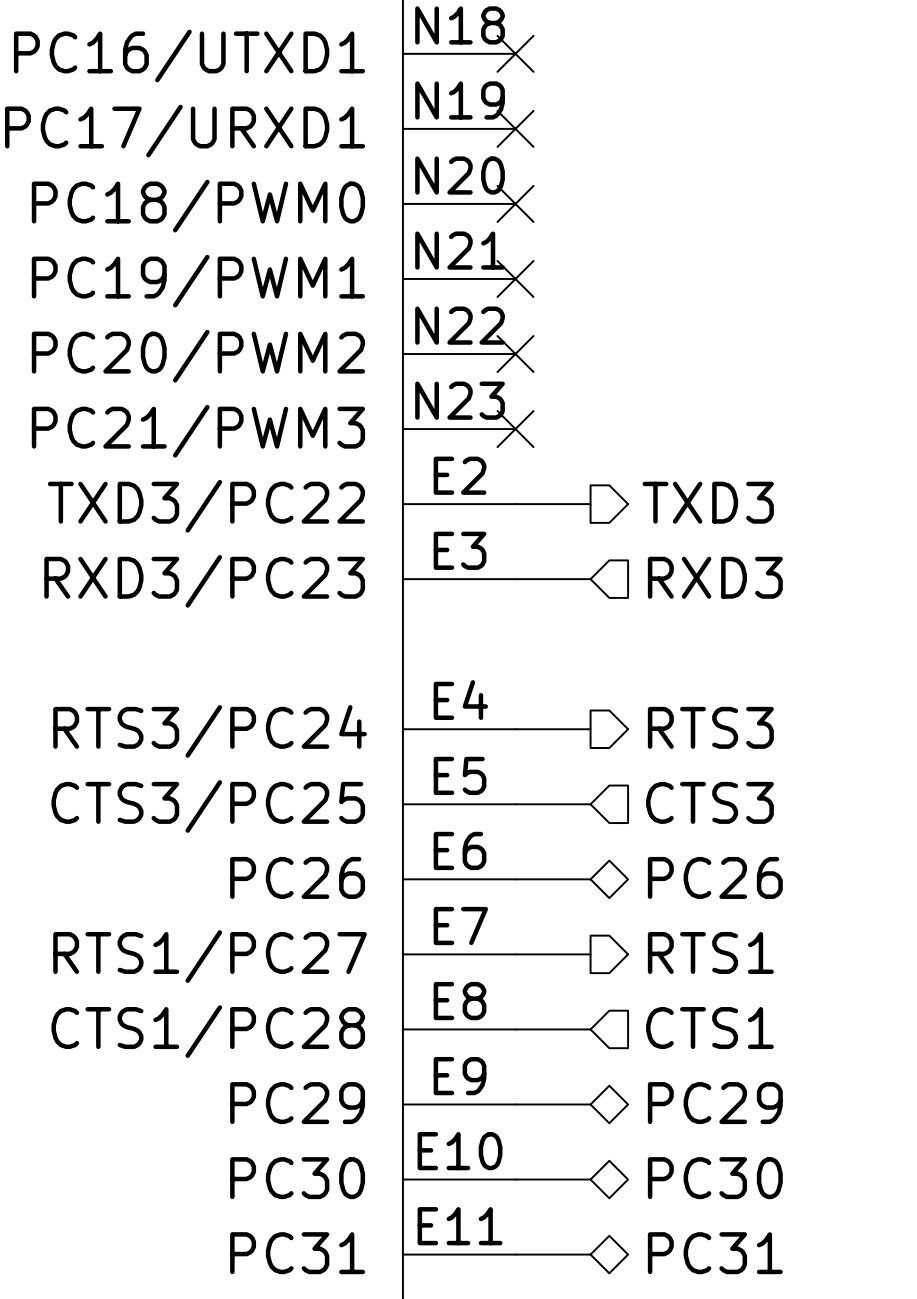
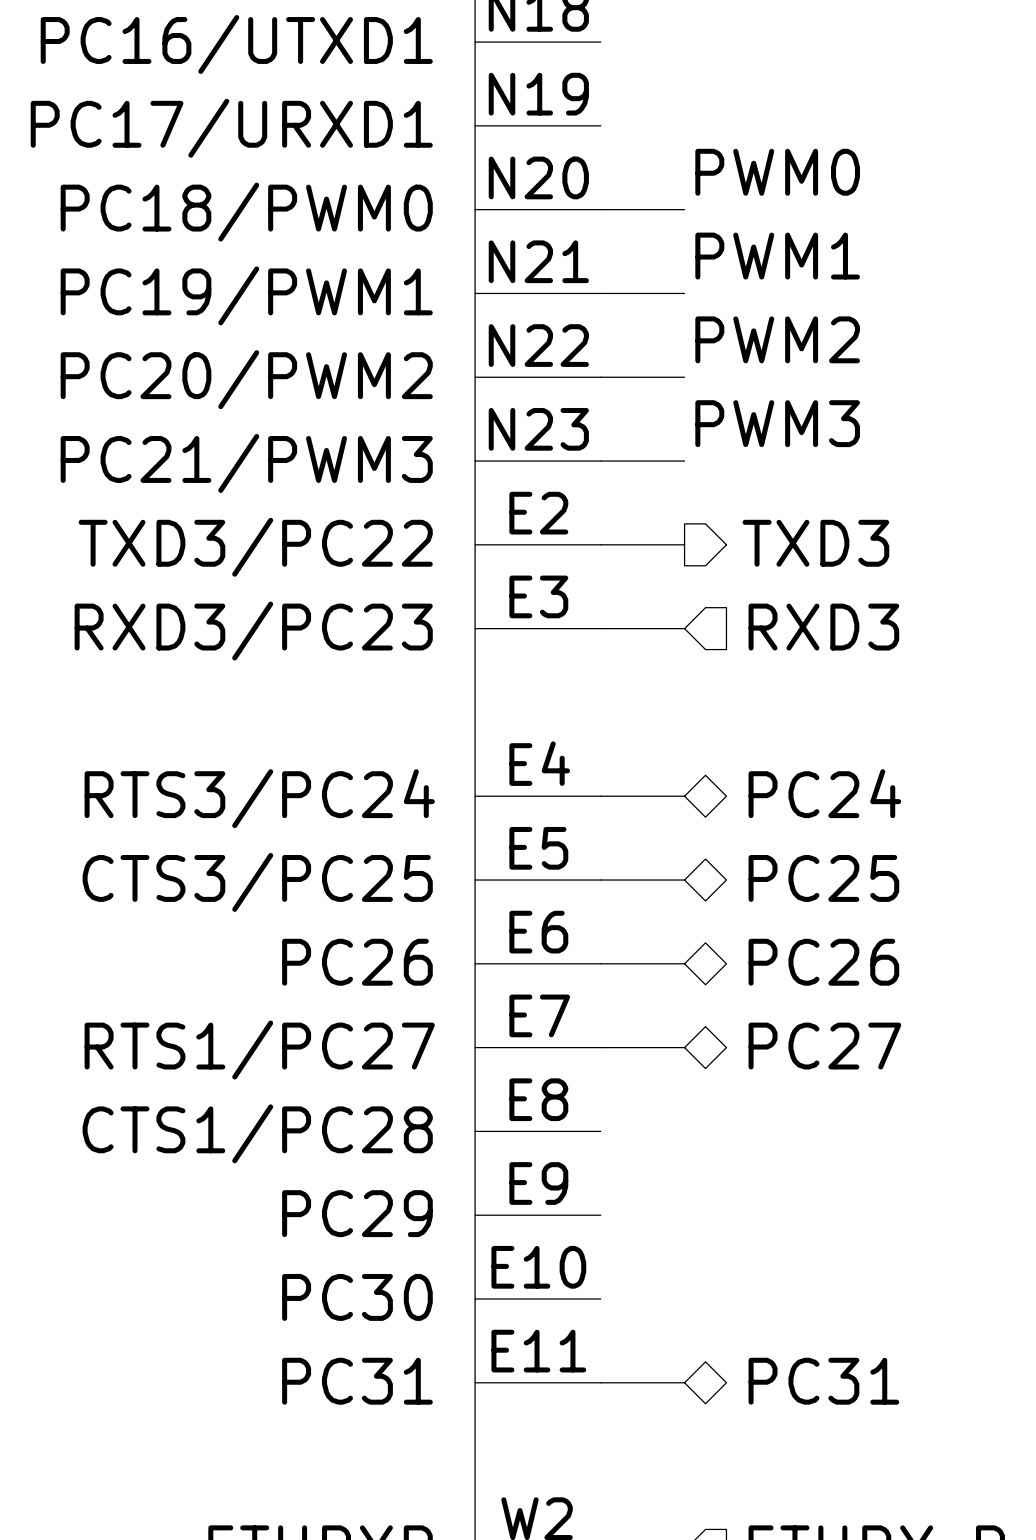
no-connect mark: (515, 53) -> none
no-connect mark: (515, 128) -> none
label: none -> PWM0 (777, 172)
wire: none -> (600, 209) (684, 209)
no-connect mark: (515, 203) -> none
label: none -> PWM1 (777, 256)
wire: none -> (600, 293) (684, 293)
no-connect mark: (515, 278) -> none
label: none -> PWM2 (777, 339)
no-connect mark: (515, 354) -> none
label: none -> PWM3 (777, 423)
no-connect mark: (515, 429) -> none
hierarchical label shape: output (710, 727) -> bidirectional (824, 793)
hierarchical label: RTS3 (710, 727) -> PC24 (824, 793)
hierarchical label shape: input (709, 802) -> bidirectional (823, 878)
hierarchical label: CTS3 (709, 802) -> PC25 (823, 878)
hierarchical label shape: output (710, 952) -> bidirectional (824, 1046)
hierarchical label: RTS1 (710, 952) -> PC27 (824, 1046)
hierarchical label: CTS1 (709, 1028) -> none
wire: (515, 1029) (590, 1029) -> (600, 377) (684, 377)
hierarchical label: PC29 (715, 1103) -> none
wire: (515, 1104) (590, 1104) -> (600, 461) (684, 461)
hierarchical label: PC30 (715, 1178) -> none
wire: (515, 1179) (590, 1179) -> none

